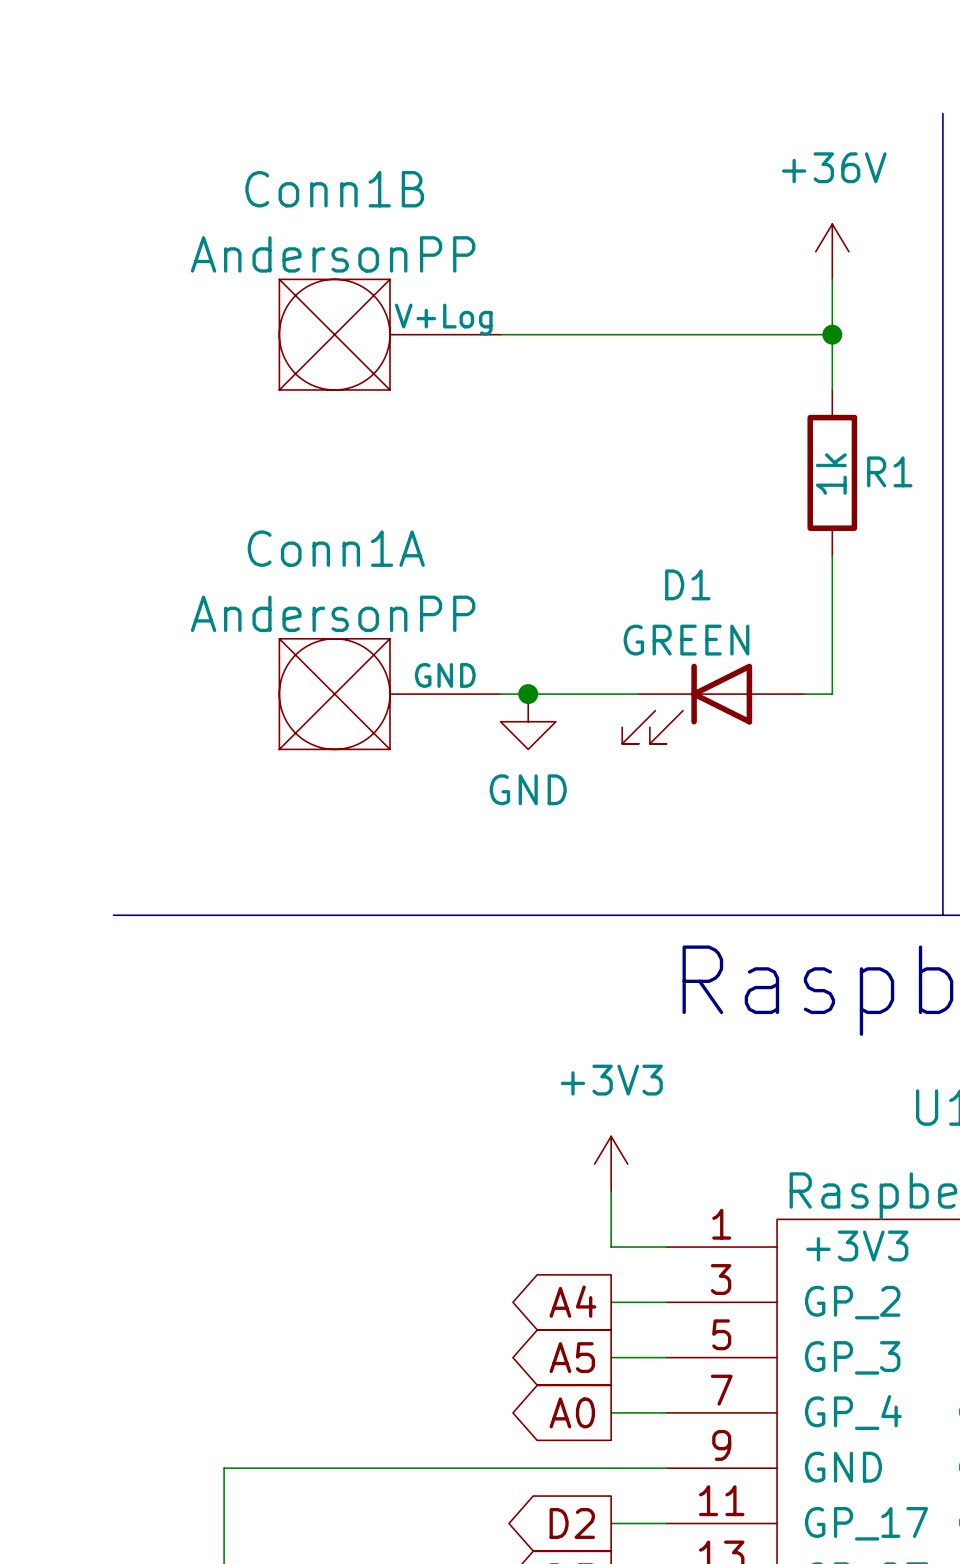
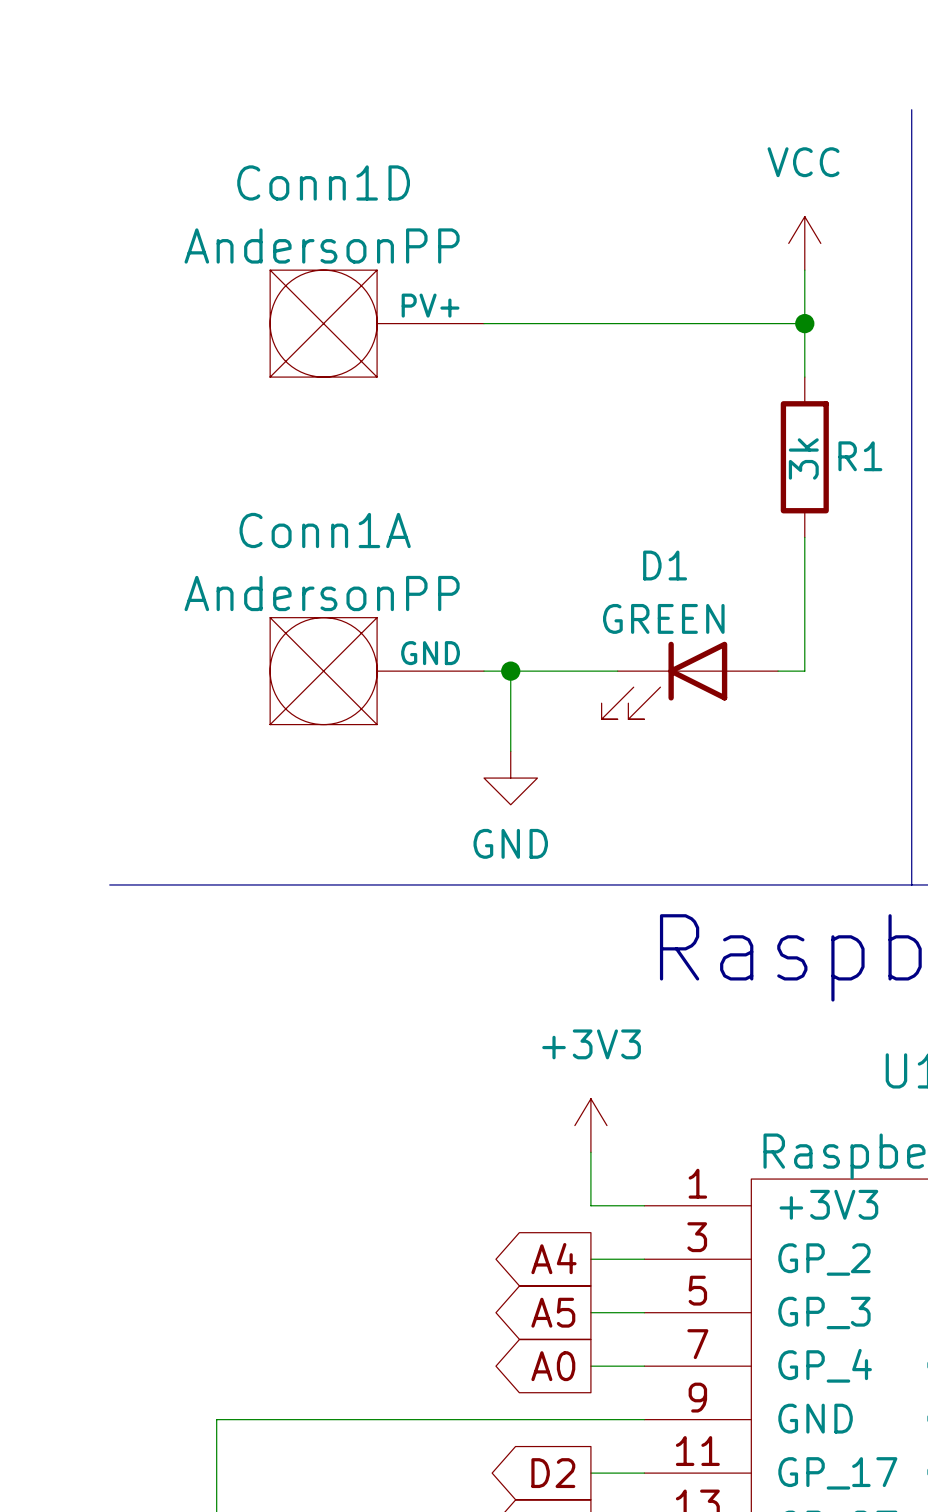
Conn1B name: Conn1B (334, 189) -> Conn1D (323, 182)
power symbol: +36V (832, 251) -> VCC (804, 243)
Conn1B pin name: V+Log (443, 319) -> PV+ (430, 305)
R1 value: 1k (831, 474) -> 3k (803, 458)
wire: none -> (510, 671) (510, 751)
power symbol position: GND (528, 721) -> GND (510, 778)

